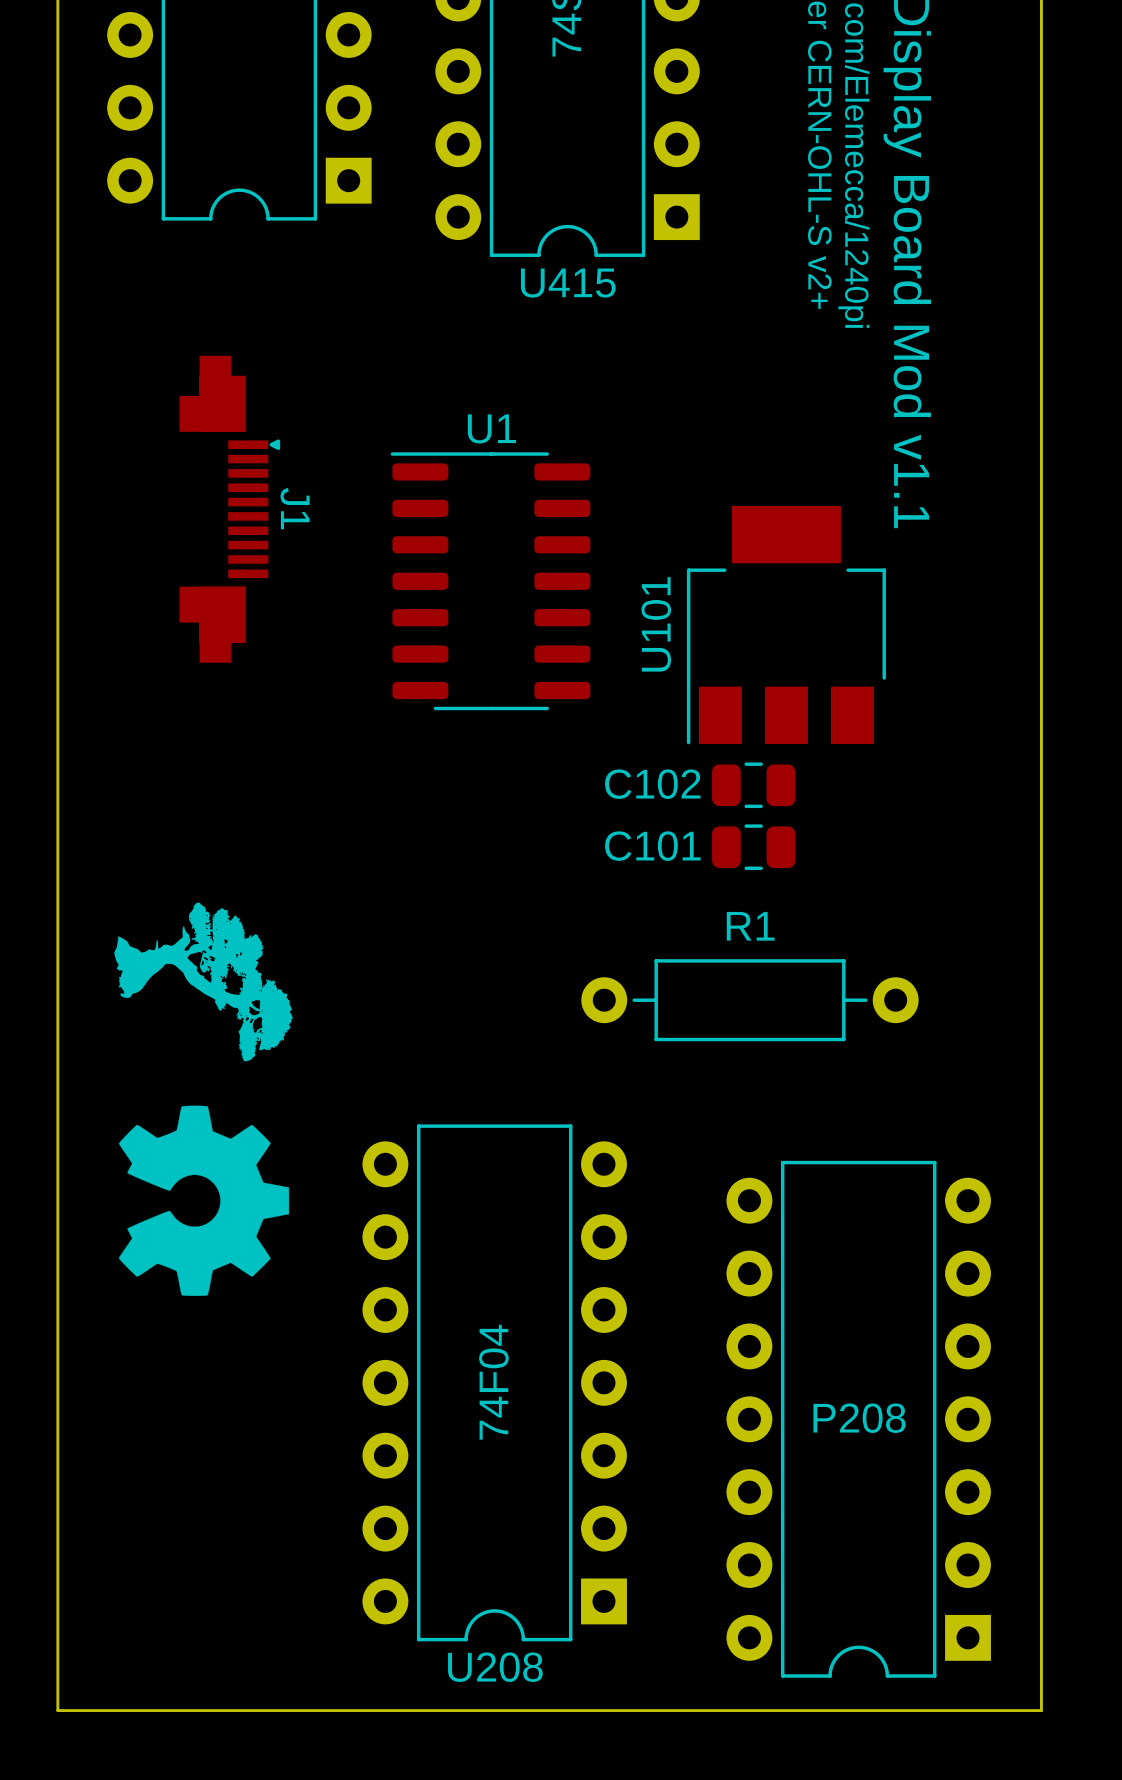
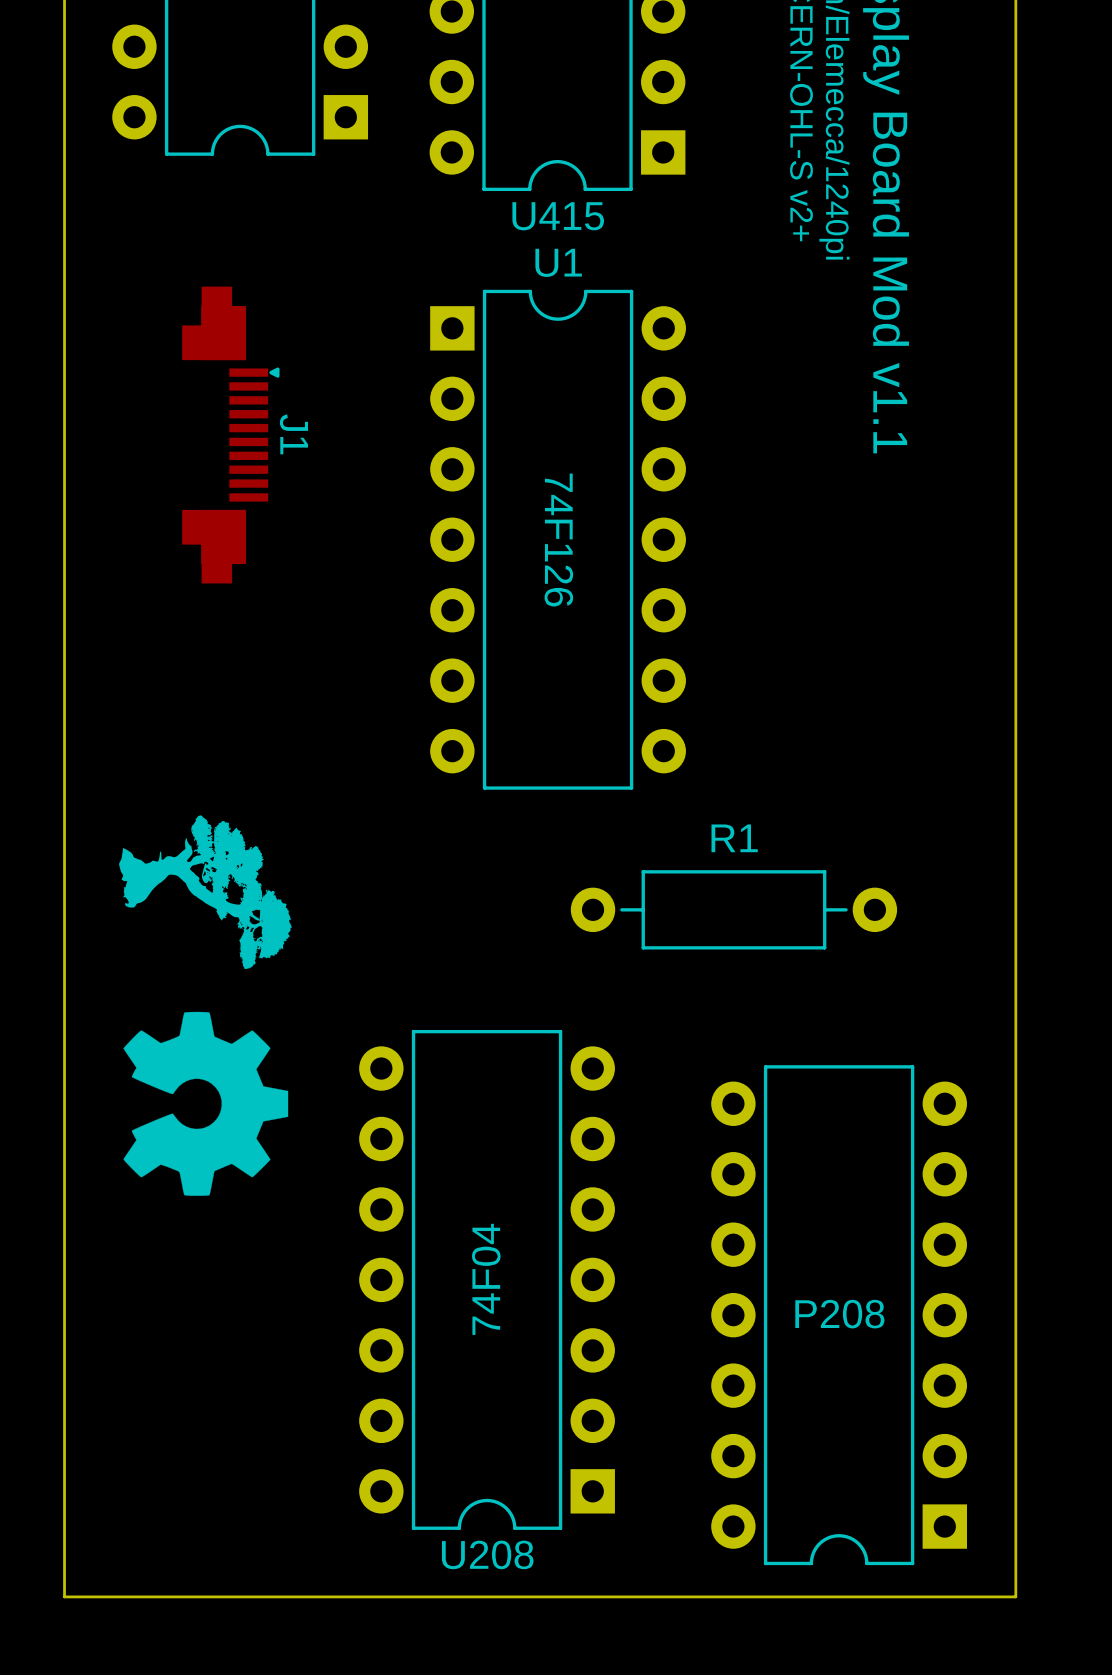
U1 name position: U1 (491, 428) -> U1 (558, 262)
U1 footprint: [390, 452, 591, 711] -> [430, 289, 686, 790]
U1 value: none -> 74F126 (558, 540)
U101: (786, 625) -> none
C102: (753, 785) -> none
C101: (753, 847) -> none

